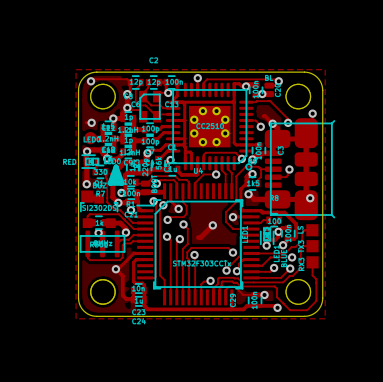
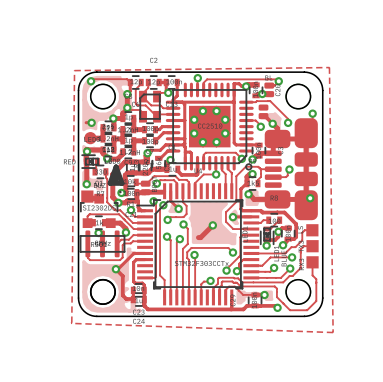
zone outline: (76, 69) (325, 69) (325, 318) (76, 318) (76, 69) -> (329, 67) (74, 70) (71, 323) (333, 332) (329, 67)
part: none -> (263, 111)
part footprint: [264, 118, 336, 221] -> [264, 118, 318, 221]

